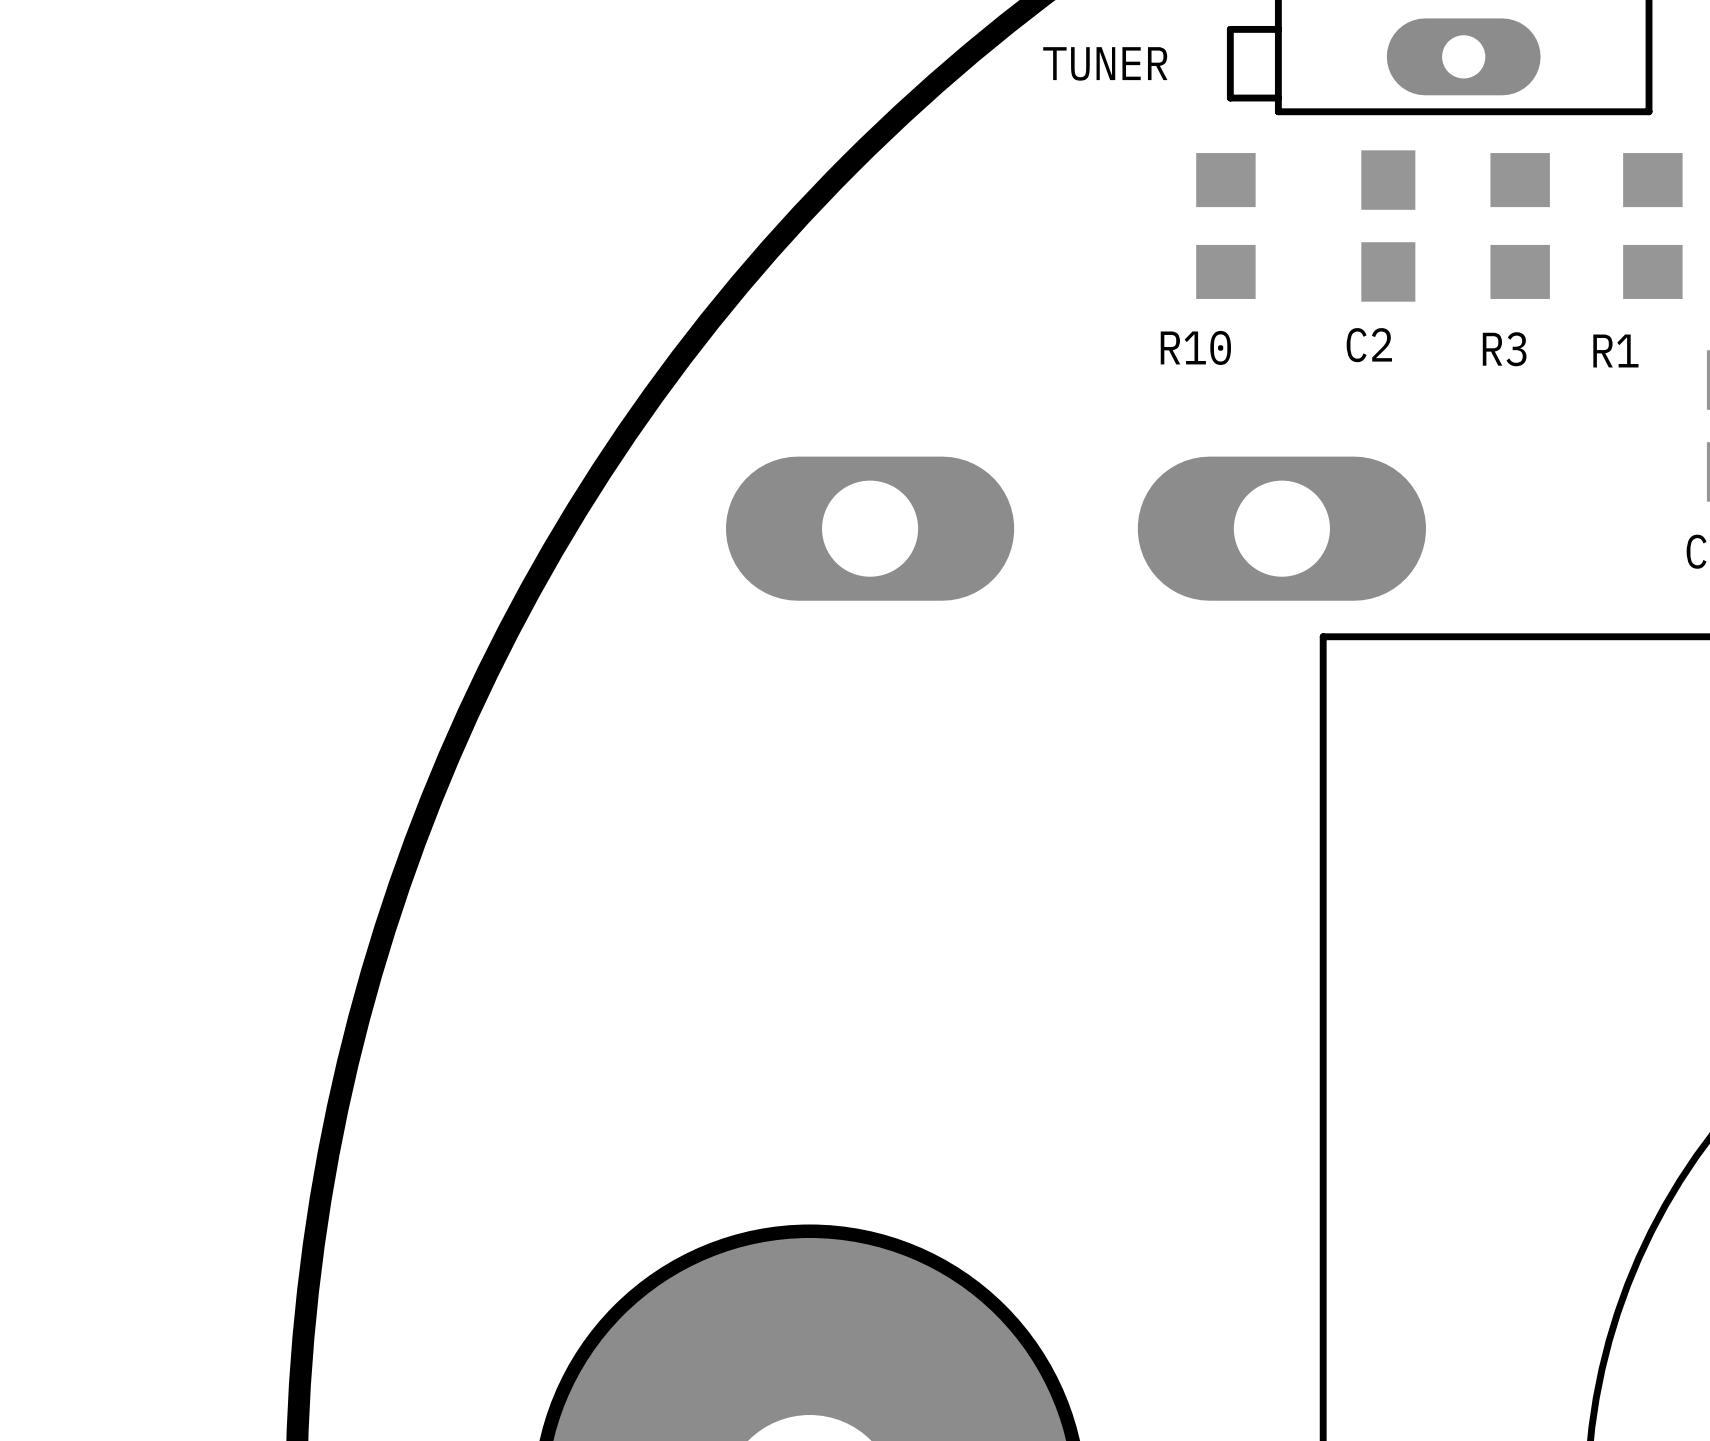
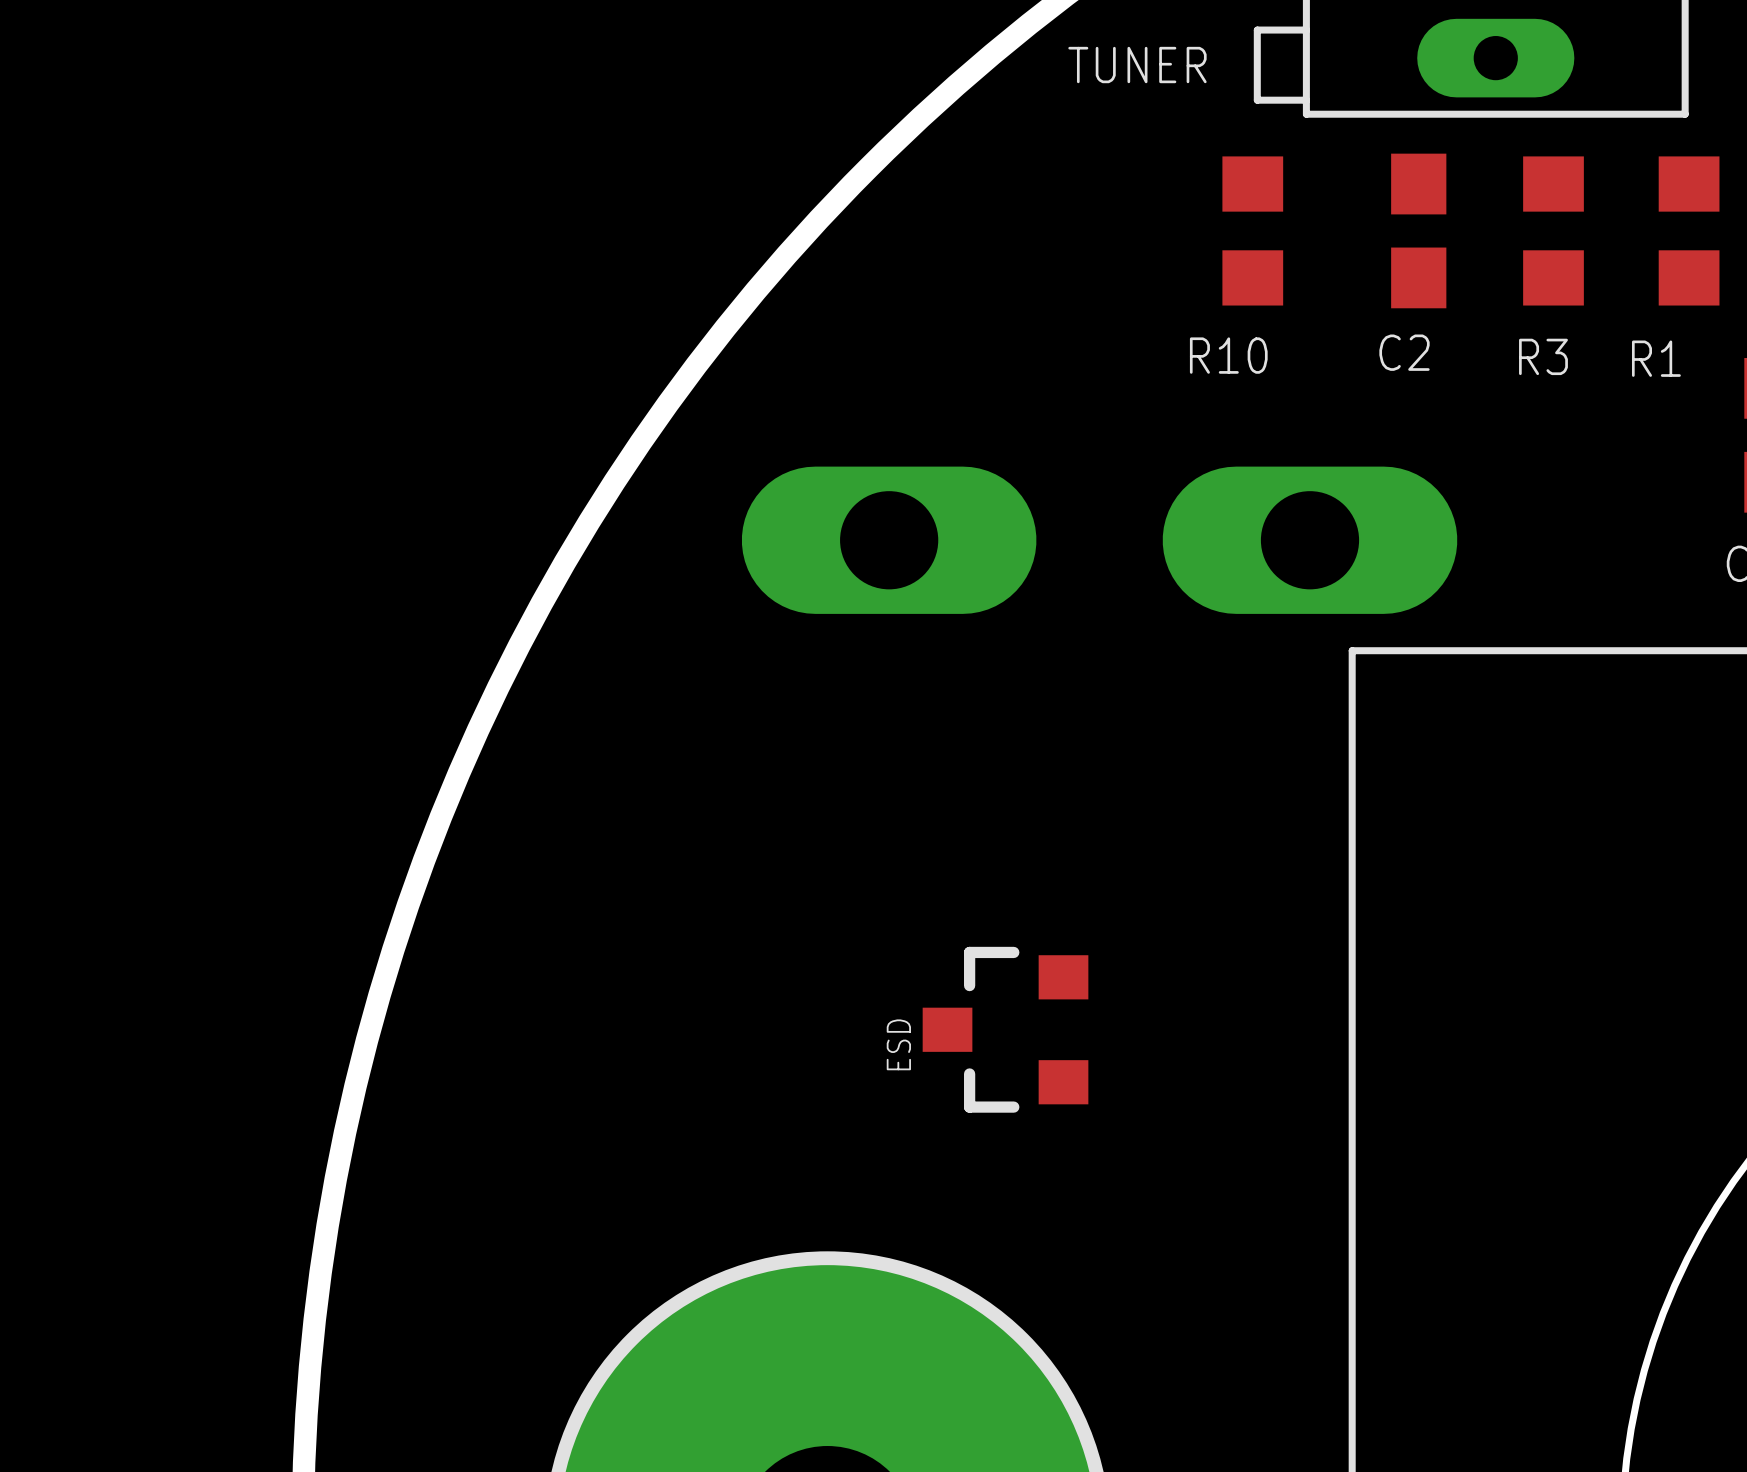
ESD: none -> (1005, 1029)

